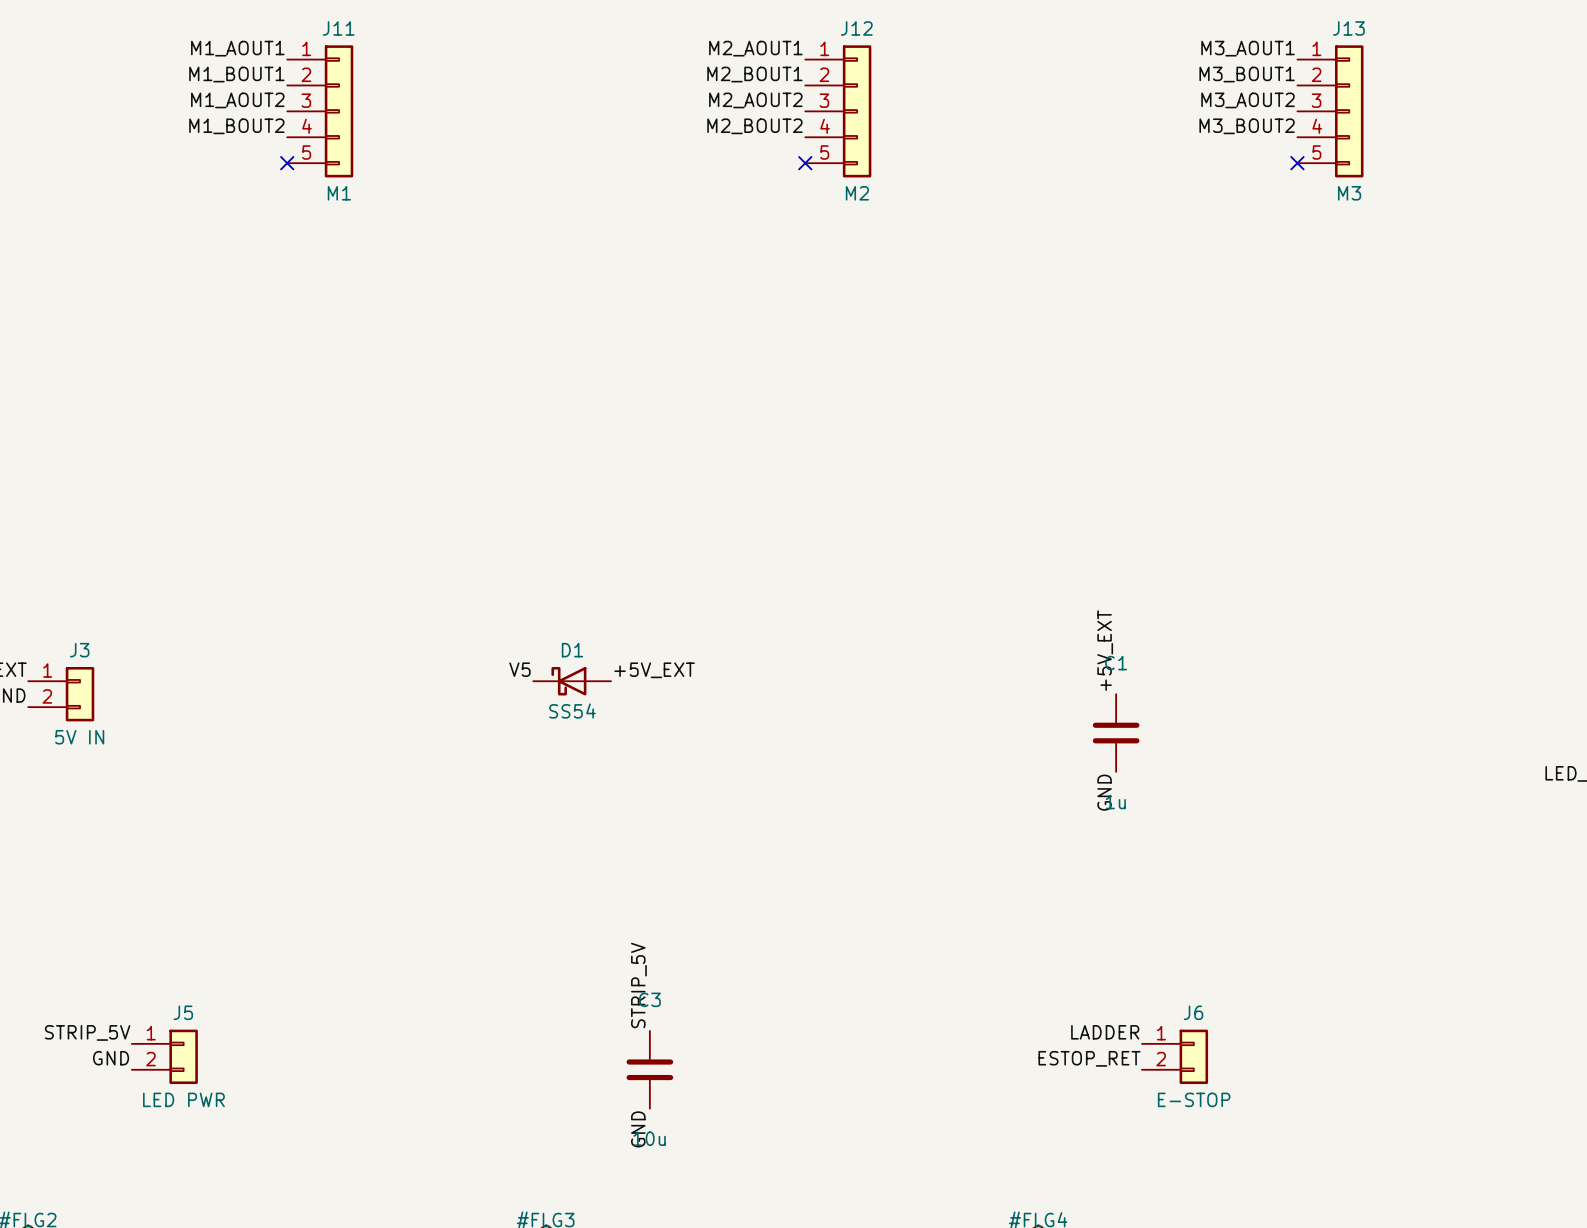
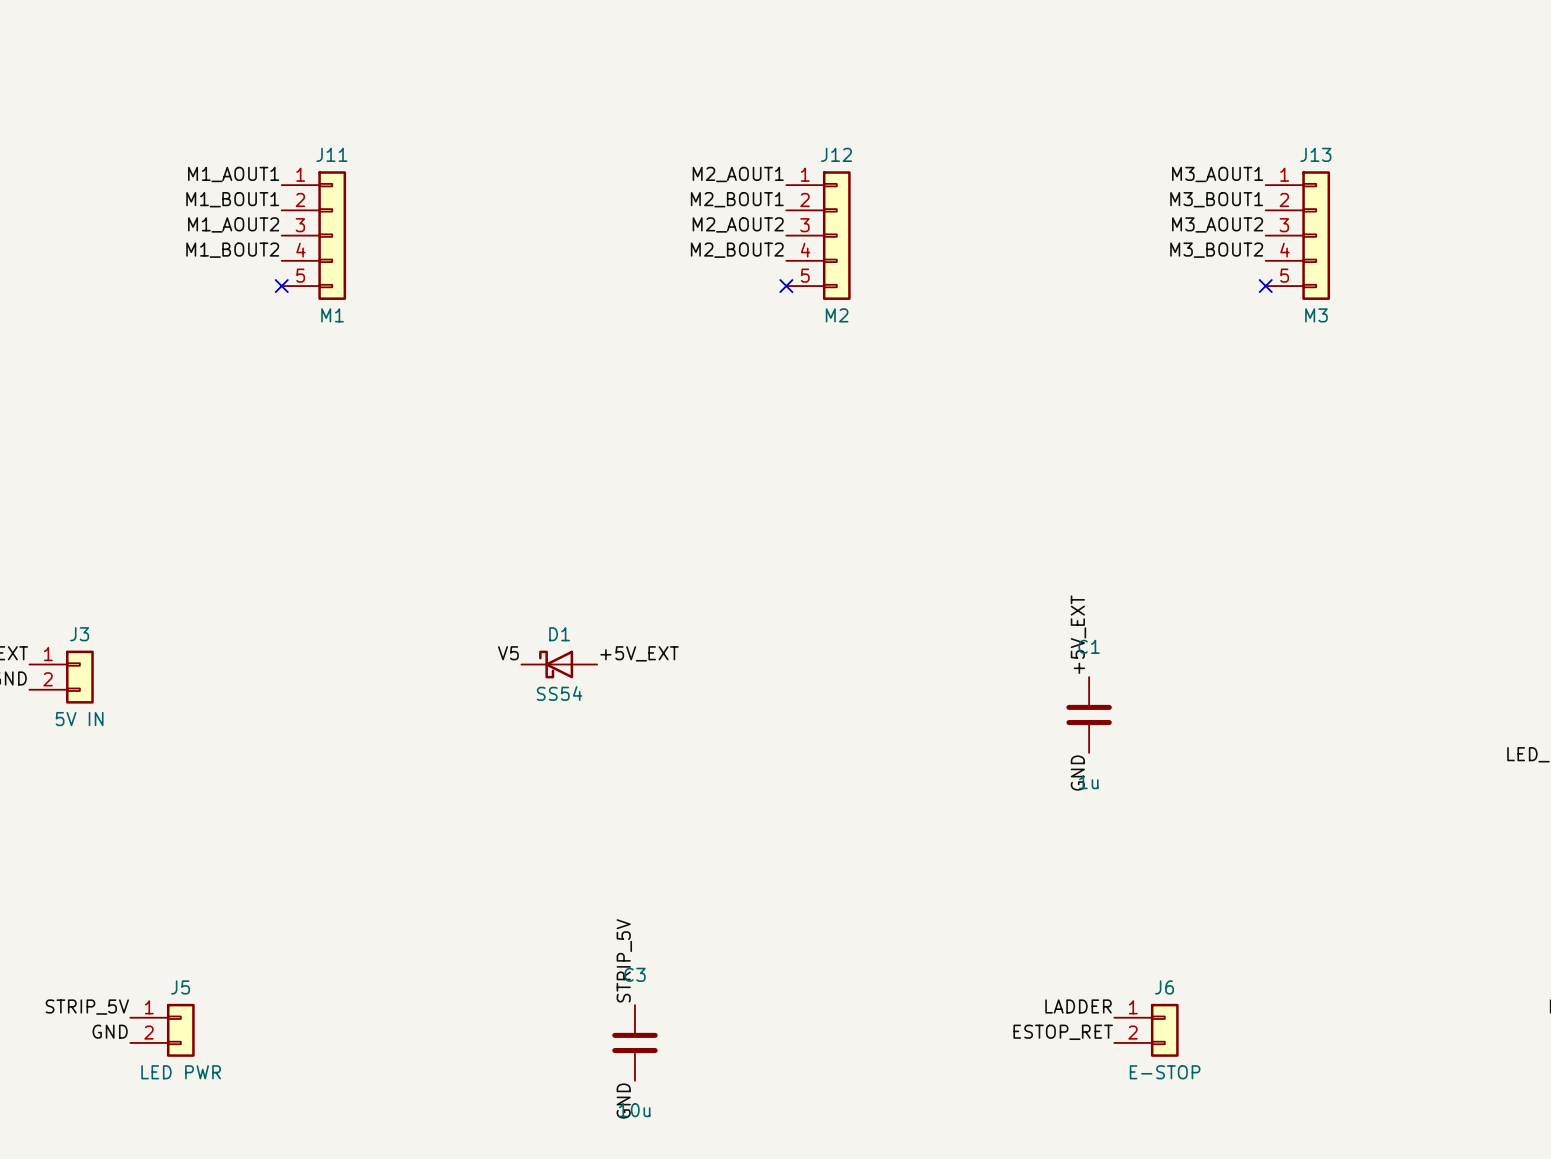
label position: M1_AOUT1 (237, 48) -> M1_AOUT1 (233, 174)
label position: M2_AOUT1 (755, 48) -> M2_AOUT1 (738, 174)
label position: M3_AOUT1 (1248, 48) -> M3_AOUT1 (1217, 174)
label position: M1_BOUT1 (236, 74) -> M1_BOUT1 (232, 199)
label position: M2_BOUT1 (754, 74) -> M2_BOUT1 (737, 199)
label position: M3_BOUT1 (1247, 74) -> M3_BOUT1 (1216, 199)
label position: M1_AOUT2 (237, 100) -> M1_AOUT2 (233, 224)
label position: M2_AOUT2 (755, 100) -> M2_AOUT2 (738, 224)
label position: M3_AOUT2 (1248, 100) -> M3_AOUT2 (1217, 224)
J11 position: (320, 111) -> (313, 235)
J12 position: (838, 111) -> (818, 235)
J13 position: (1330, 111) -> (1297, 235)
label position: M1_BOUT2 (236, 126) -> M1_BOUT2 (232, 250)
label position: M2_BOUT2 (754, 126) -> M2_BOUT2 (737, 250)
label position: M3_BOUT2 (1247, 126) -> M3_BOUT2 (1216, 250)
no-connect mark: (287, 163) -> none
no-connect mark: (805, 163) -> none
no-connect mark: (1297, 163) -> none
no-connect mark: none -> (281, 286)
no-connect mark: none -> (786, 286)
no-connect mark: none -> (1265, 286)

